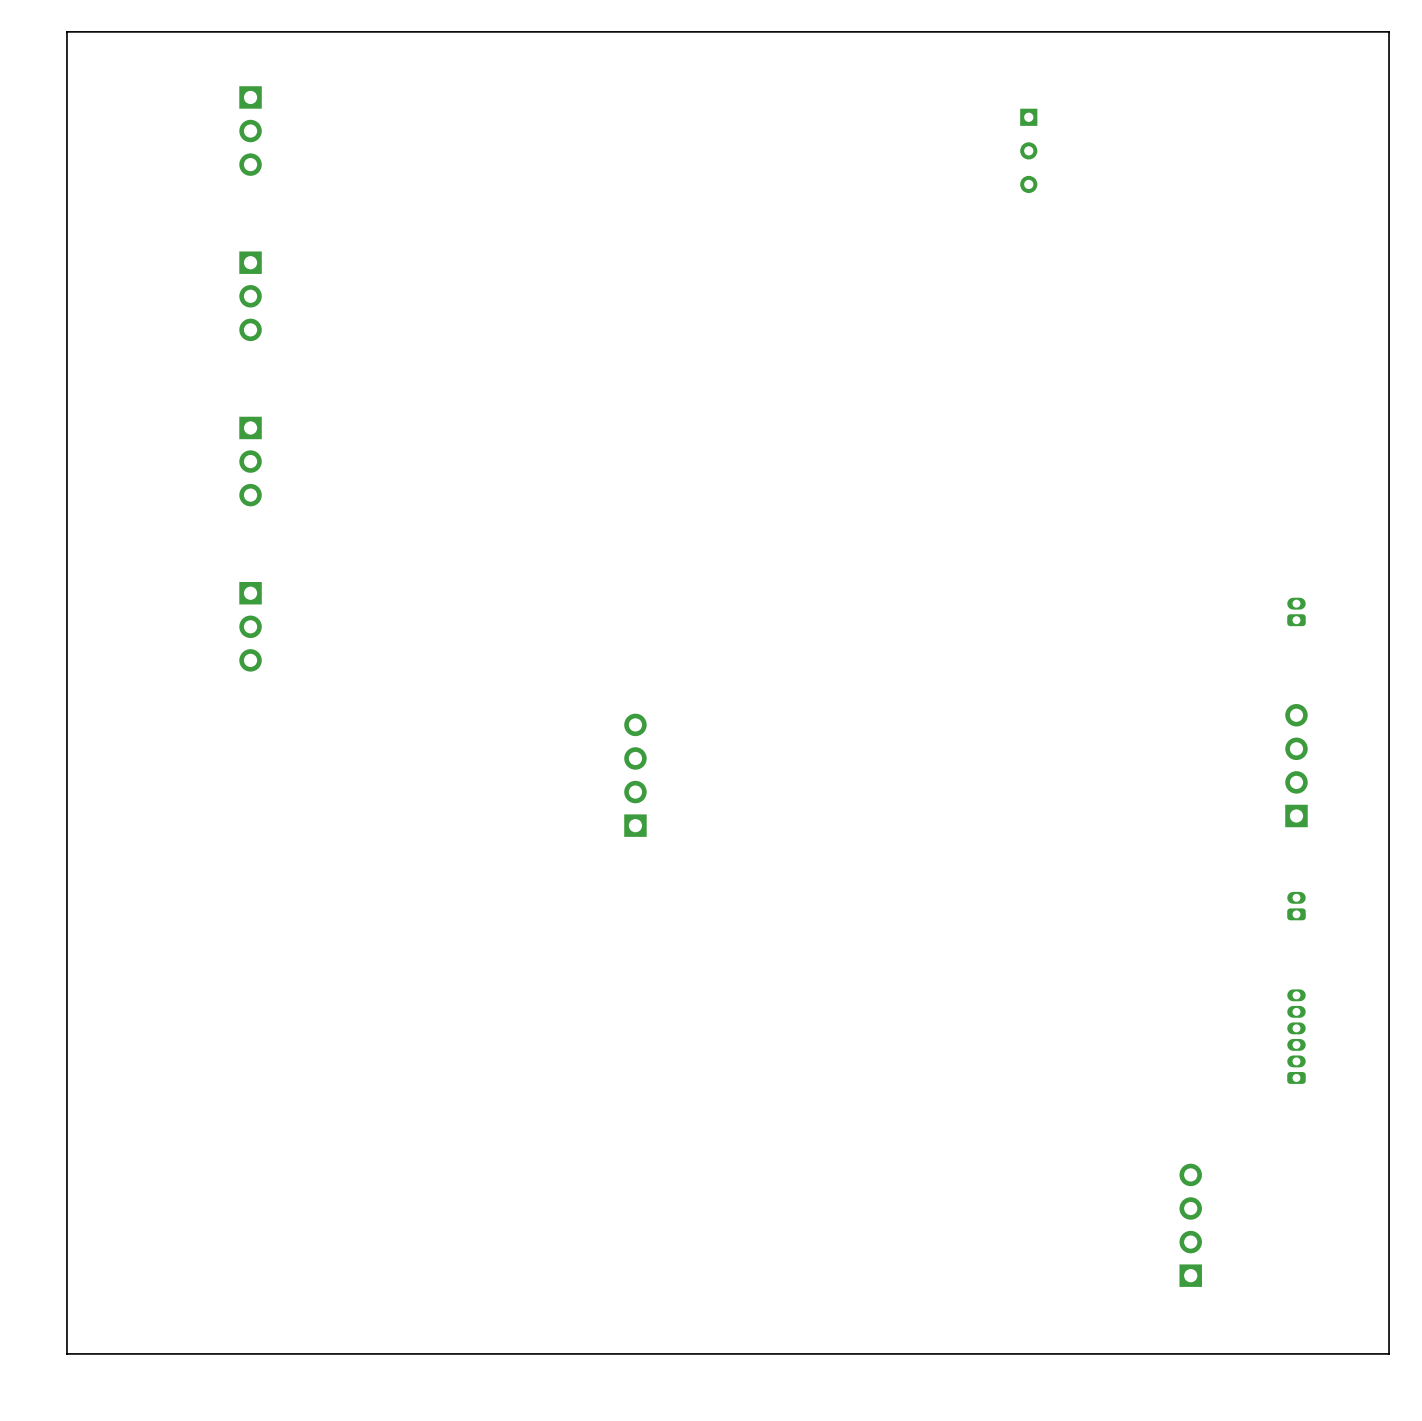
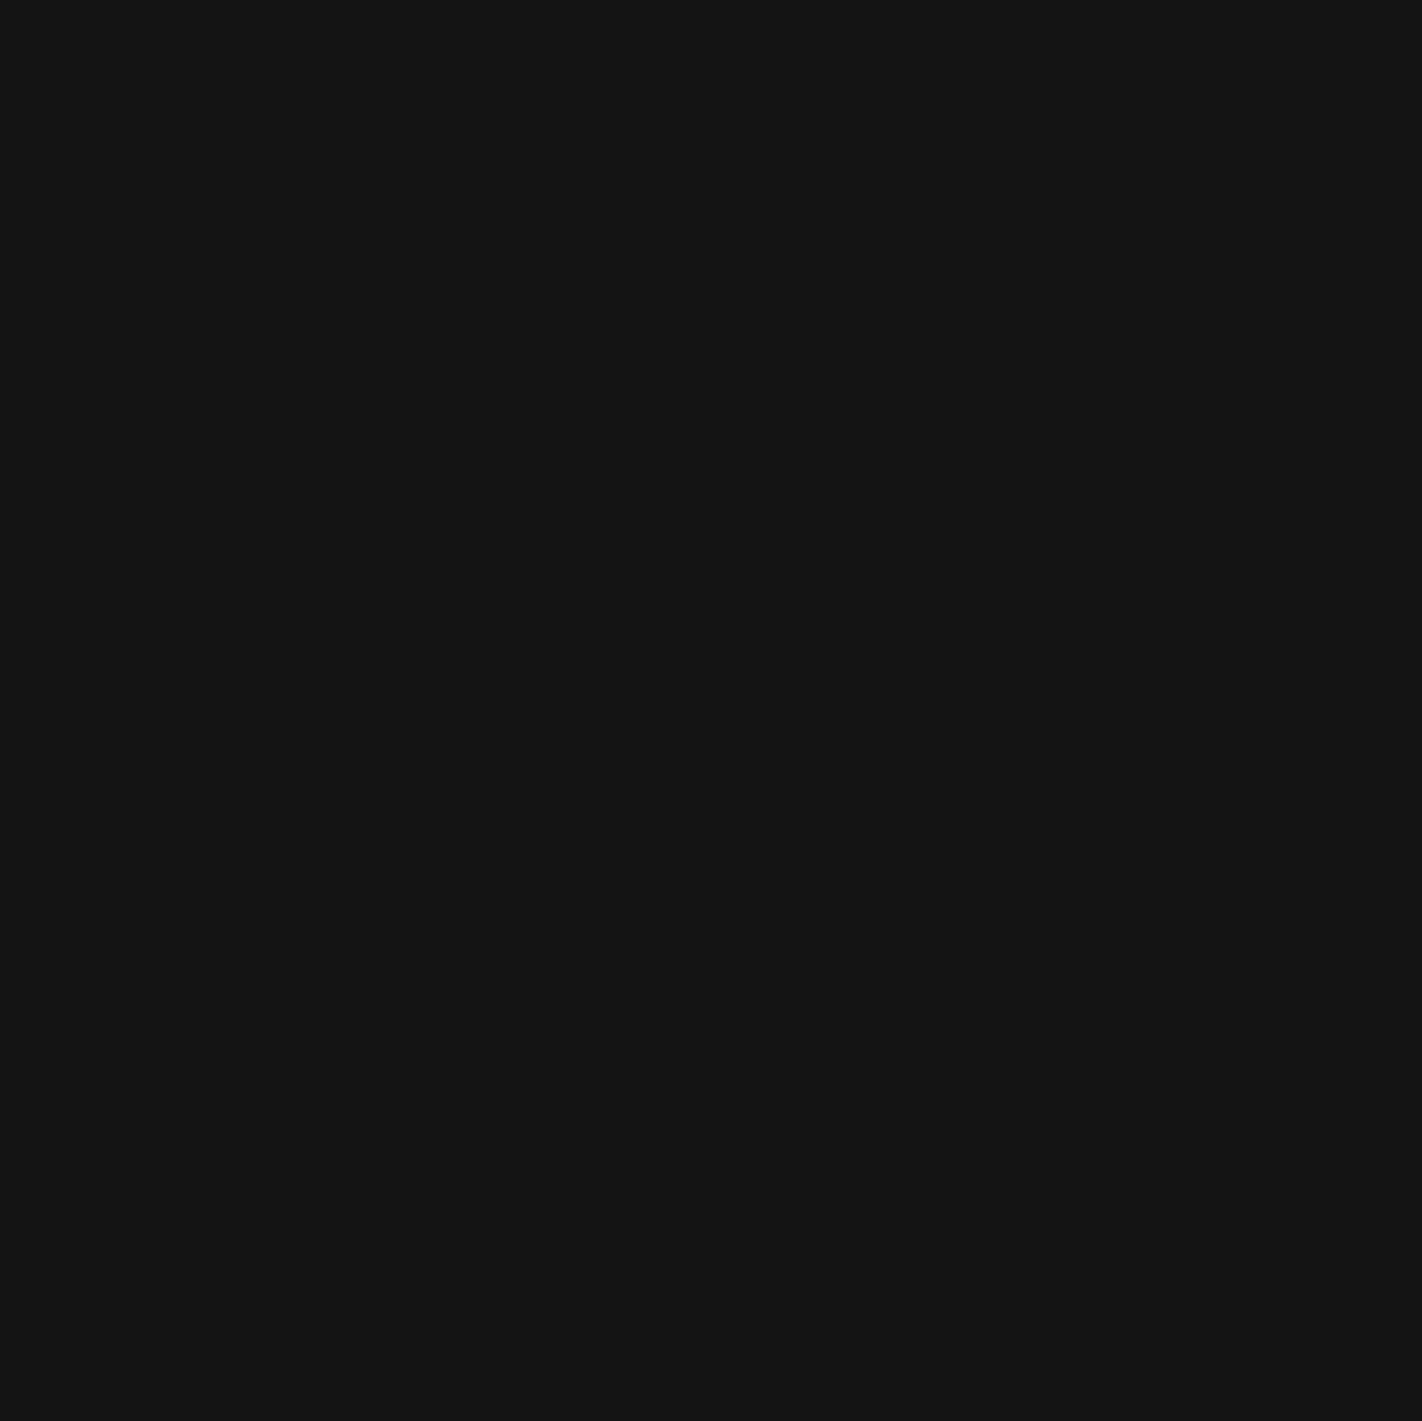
board edge: (1389, 31) (66, 31) (66, 1353) (1389, 1353) (1389, 31) -> none
part: (250, 131) -> none
part: (1028, 150) -> none
part: (250, 296) -> none
part: (250, 461) -> none
part: (1296, 611) -> none
part: (250, 626) -> none
part: (1296, 765) -> none
part: (635, 775) -> none
part: (1296, 906) -> none
part: (1296, 1036) -> none
part: (1190, 1225) -> none

